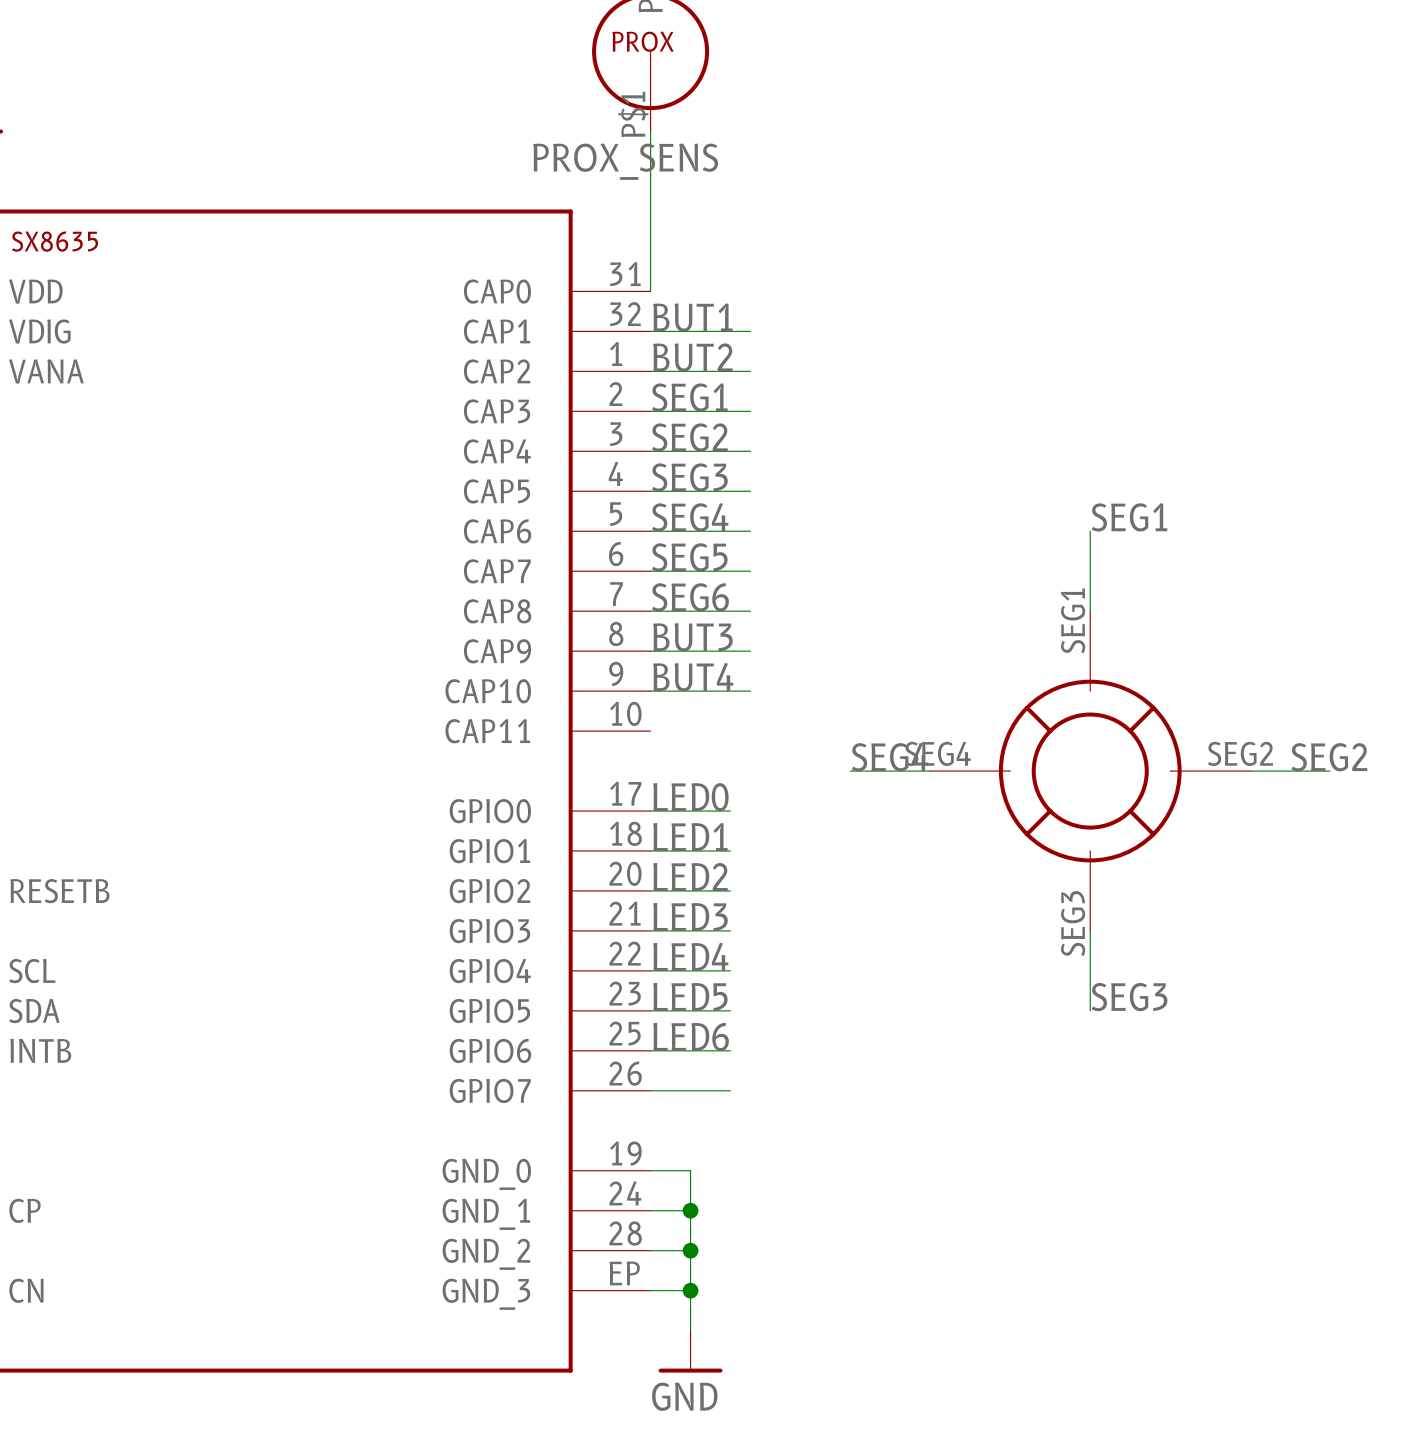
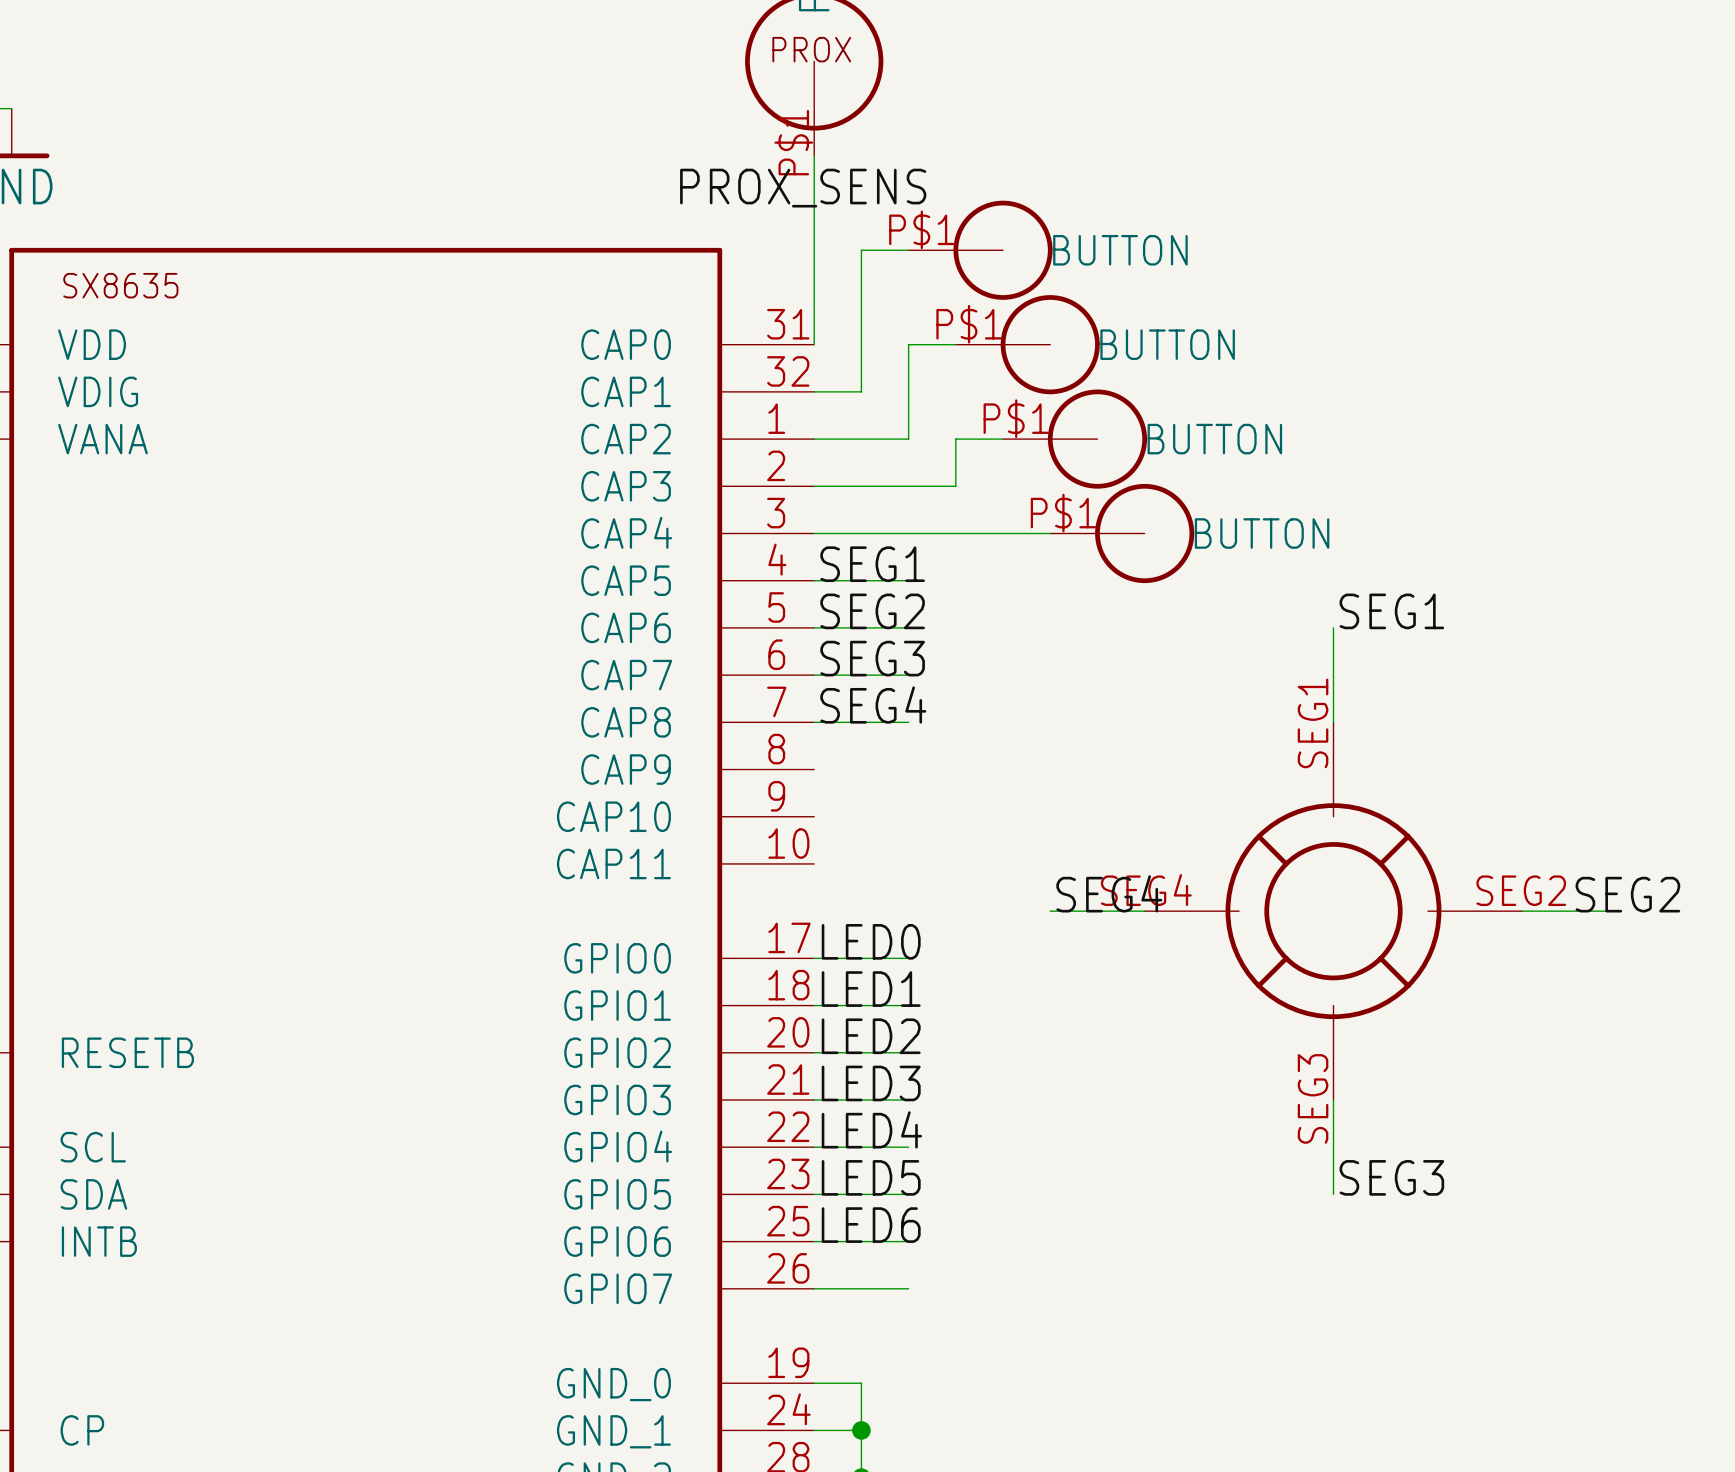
part: none -> (980, 250)
part: none -> (1027, 344)
label: BUT1 (692, 317) -> none
wire: (690, 331) (750, 331) -> (861, 391) (861, 250) (908, 250)
label: BUT2 (692, 357) -> none
wire: (730, 371) (750, 371) -> (908, 439) (908, 344) (955, 344)
wire: none -> (1003, 439) (955, 439) (955, 486) (932, 486)
part: none -> (1075, 439)
label: SEG1 (689, 397) -> none
label: SEG2 (689, 437) -> none
part: none -> (1122, 533)
label: SEG3 (689, 477) -> SEG1 (872, 564)
wire: (730, 491) (750, 491) -> none
label: SEG4 (690, 517) -> SEG2 (872, 611)
wire: (730, 531) (750, 531) -> none
label: SEG5 (689, 557) -> SEG3 (872, 658)
wire: (730, 571) (750, 571) -> none
label: SEG6 (690, 597) -> SEG4 (873, 705)
wire: (730, 611) (750, 611) -> none
label: BUT3 (692, 637) -> none
wire: (650, 651) (750, 651) -> (932, 533) (1050, 533)
label: BUT4 (693, 677) -> none
wire: (650, 691) (750, 691) -> none

